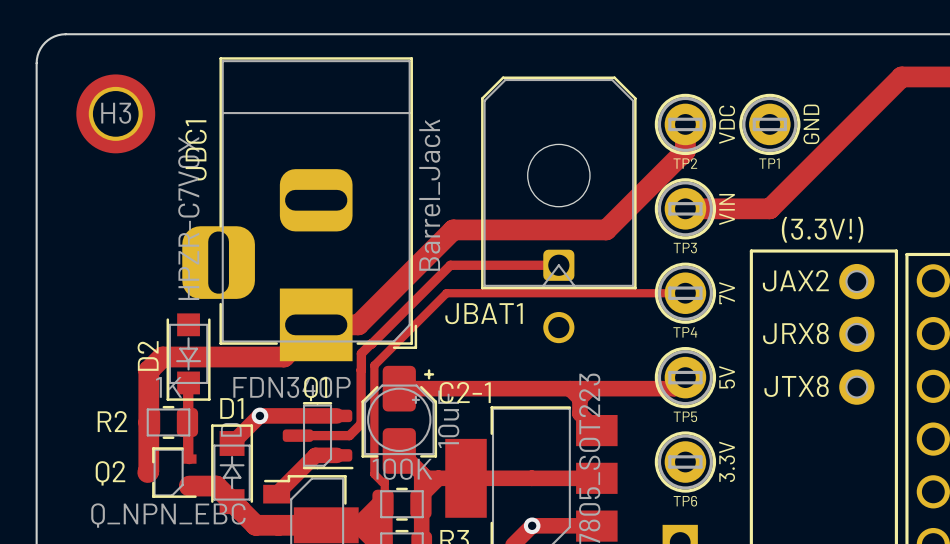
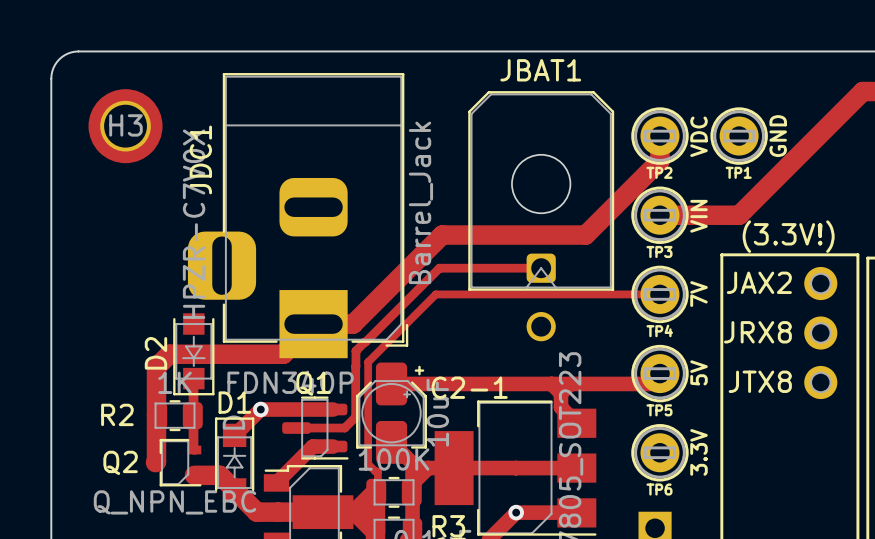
JBAT1 name position: JBAT1 (484, 313) -> JBAT1 (540, 70)

